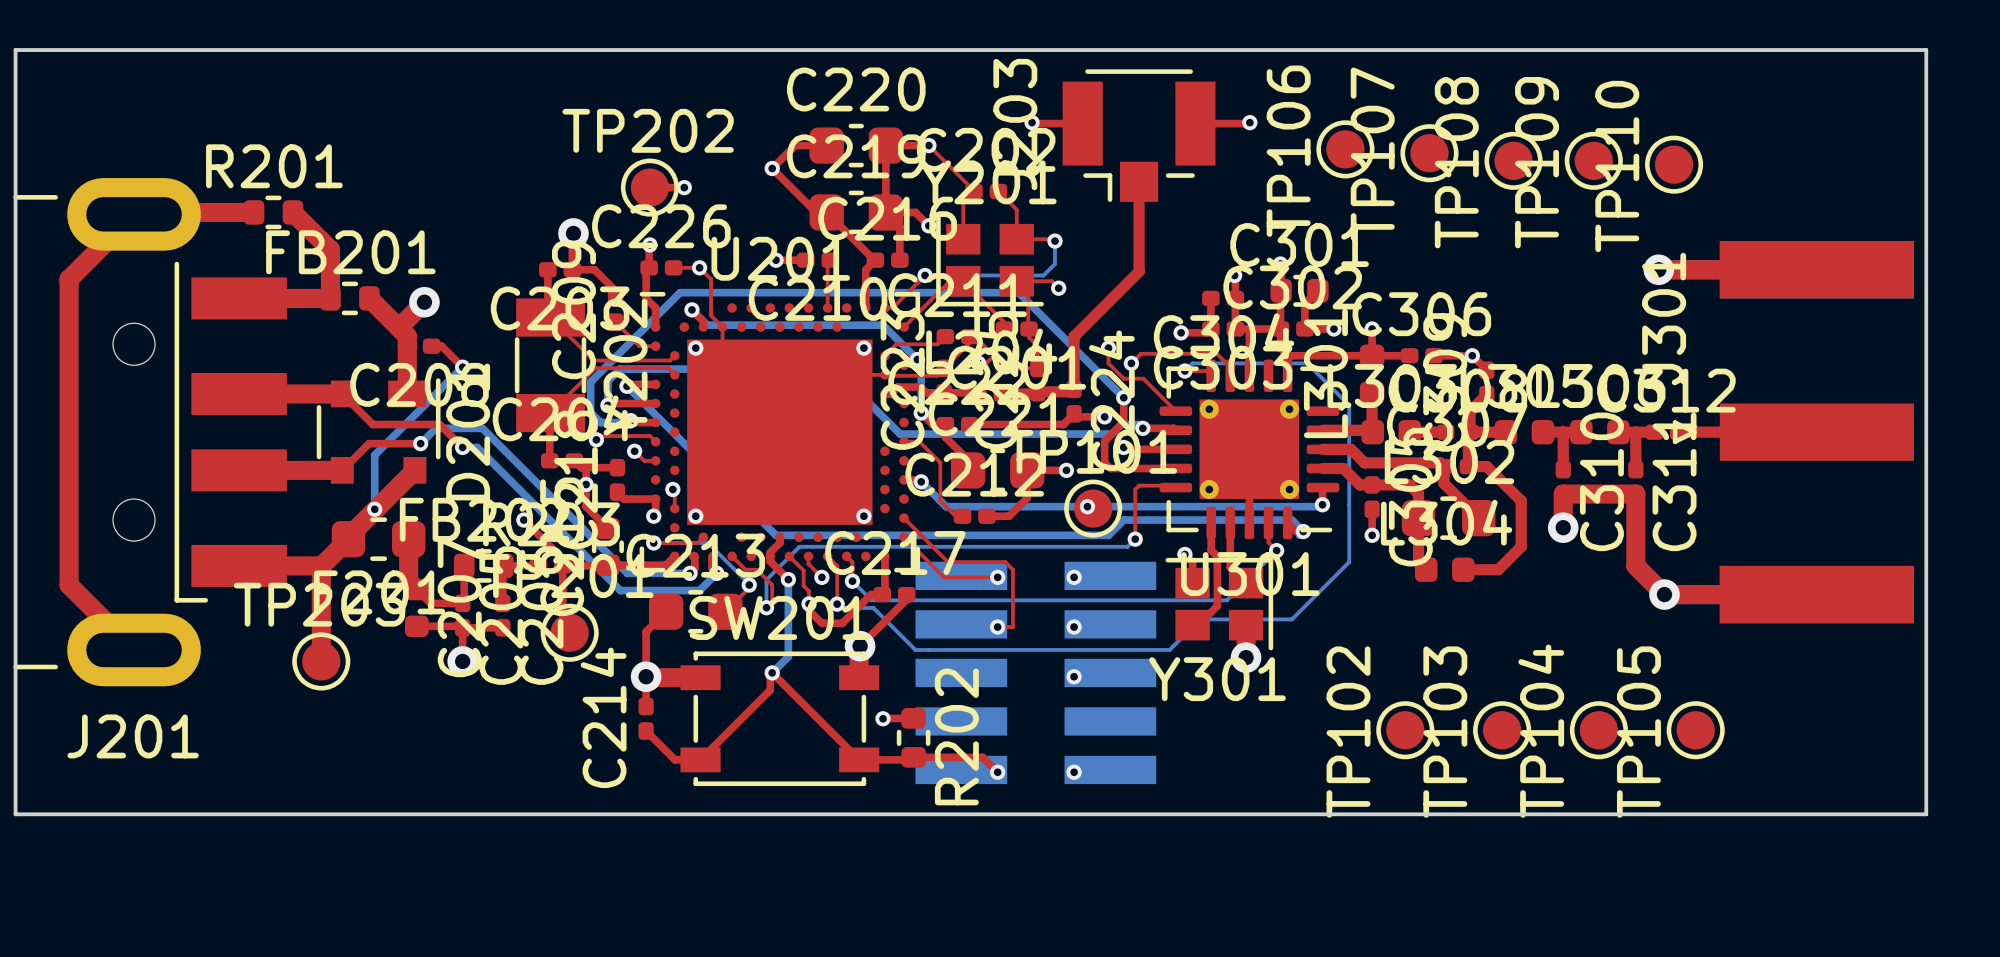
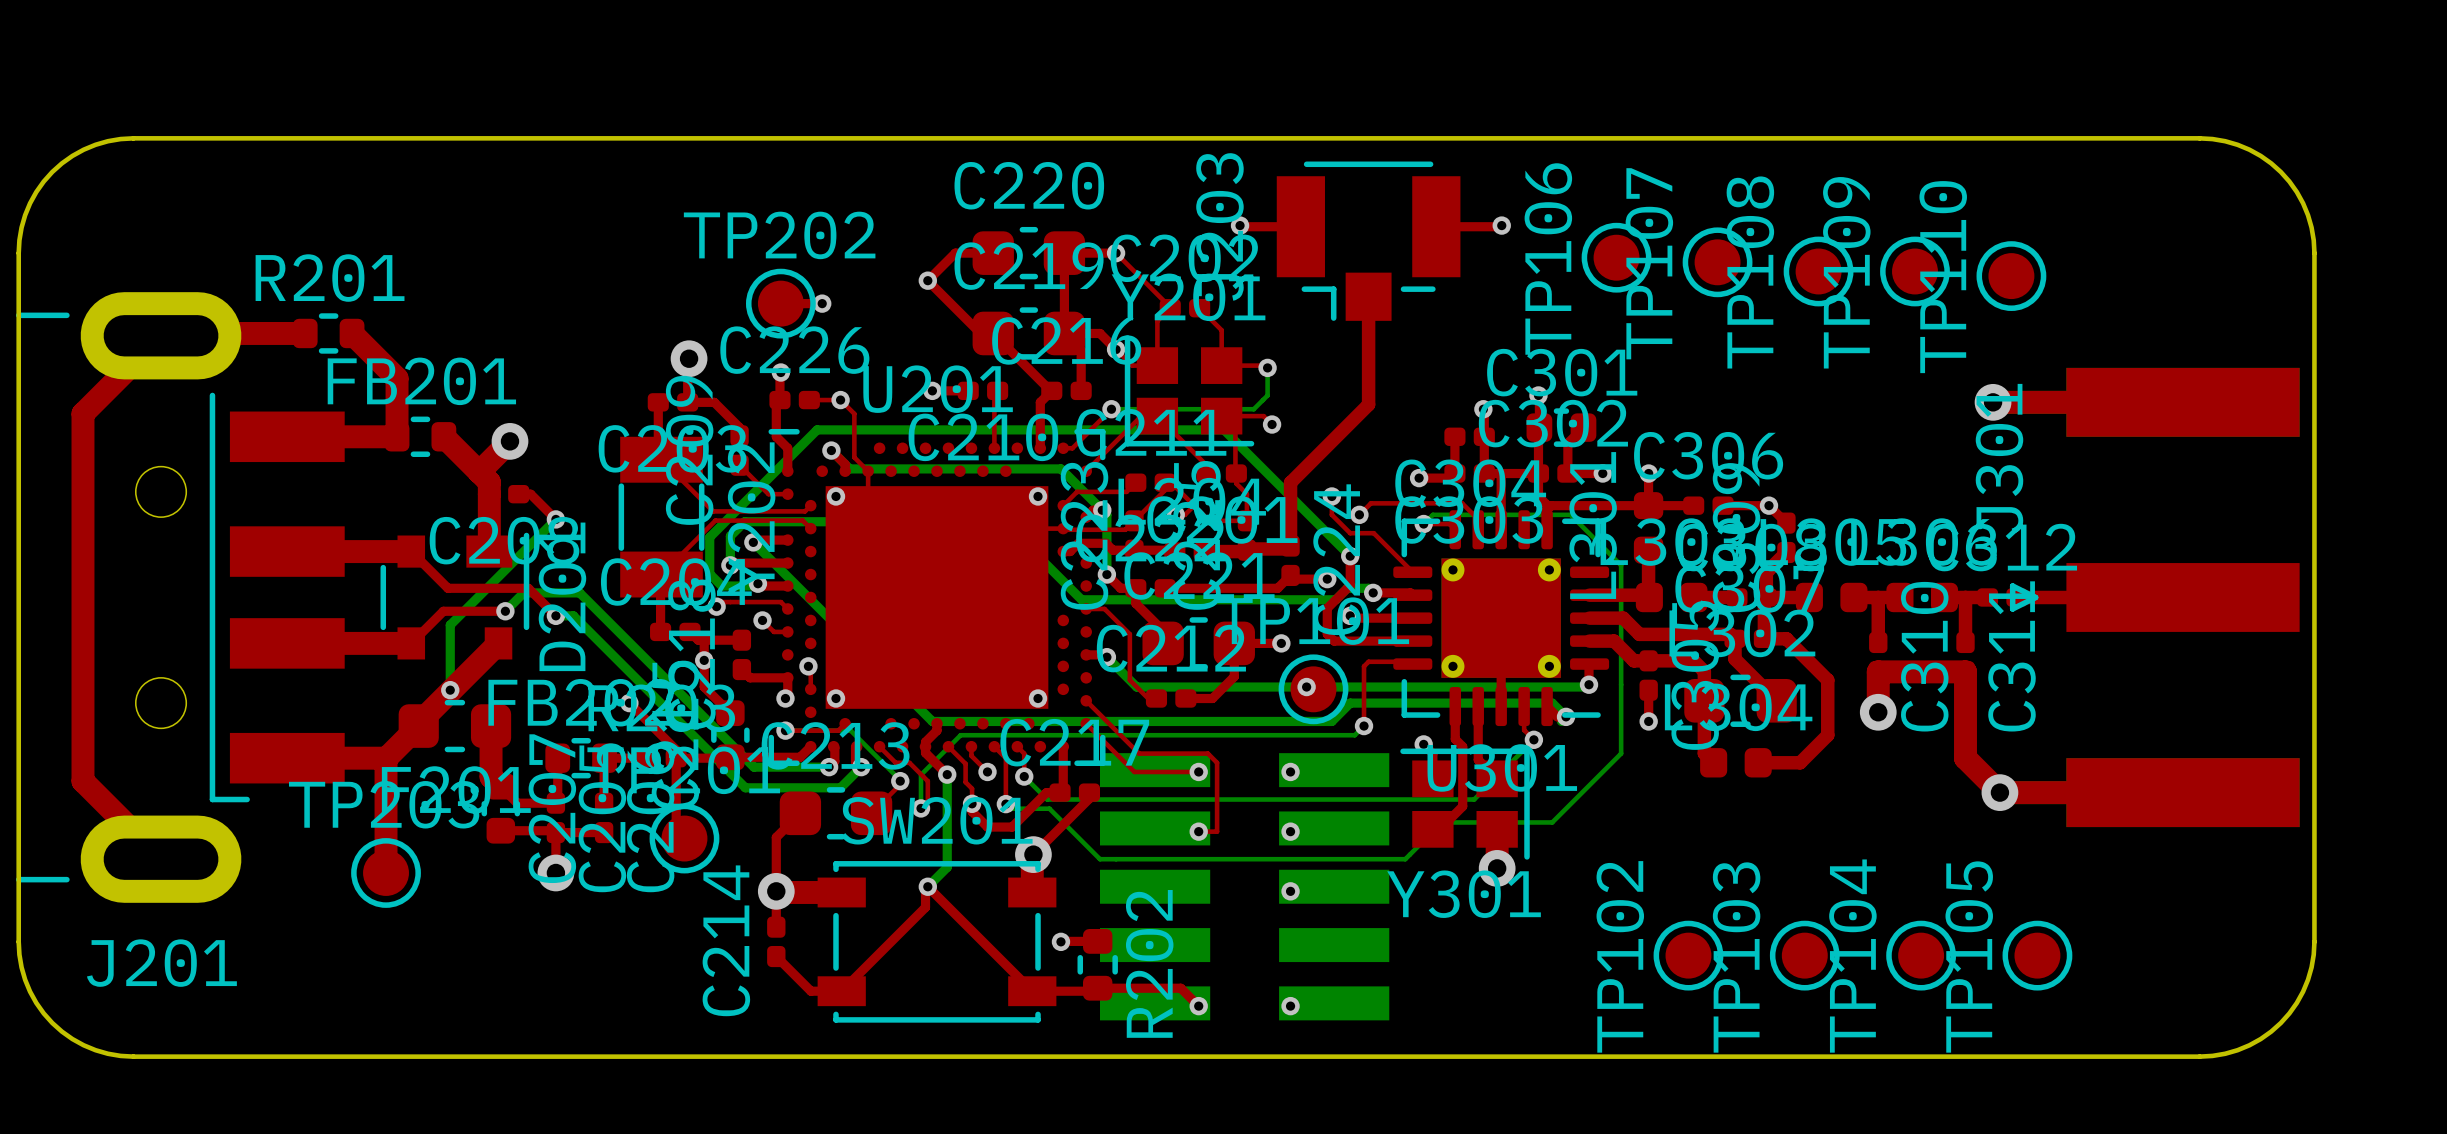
board edge: (111, 50) (15, 50) (15, 145) -> (133, 138) (95, 144) (72, 155) (52, 171) (36, 192) (25, 215) (18, 253)
board edge: (1830, 50) (1926, 50) (1926, 145) -> (2199, 138) (2237, 144) (2260, 155) (2280, 171) (2296, 192) (2308, 215) (2314, 253)
board edge: (15, 718) (15, 814) (111, 814) -> (18, 941) (21, 967) (30, 991) (52, 1023) (83, 1045) (107, 1053) (133, 1056)
board edge: (1926, 718) (1926, 814) (1830, 814) -> (2314, 941) (2311, 967) (2303, 991) (2280, 1023) (2249, 1045) (2225, 1053) (2199, 1056)

